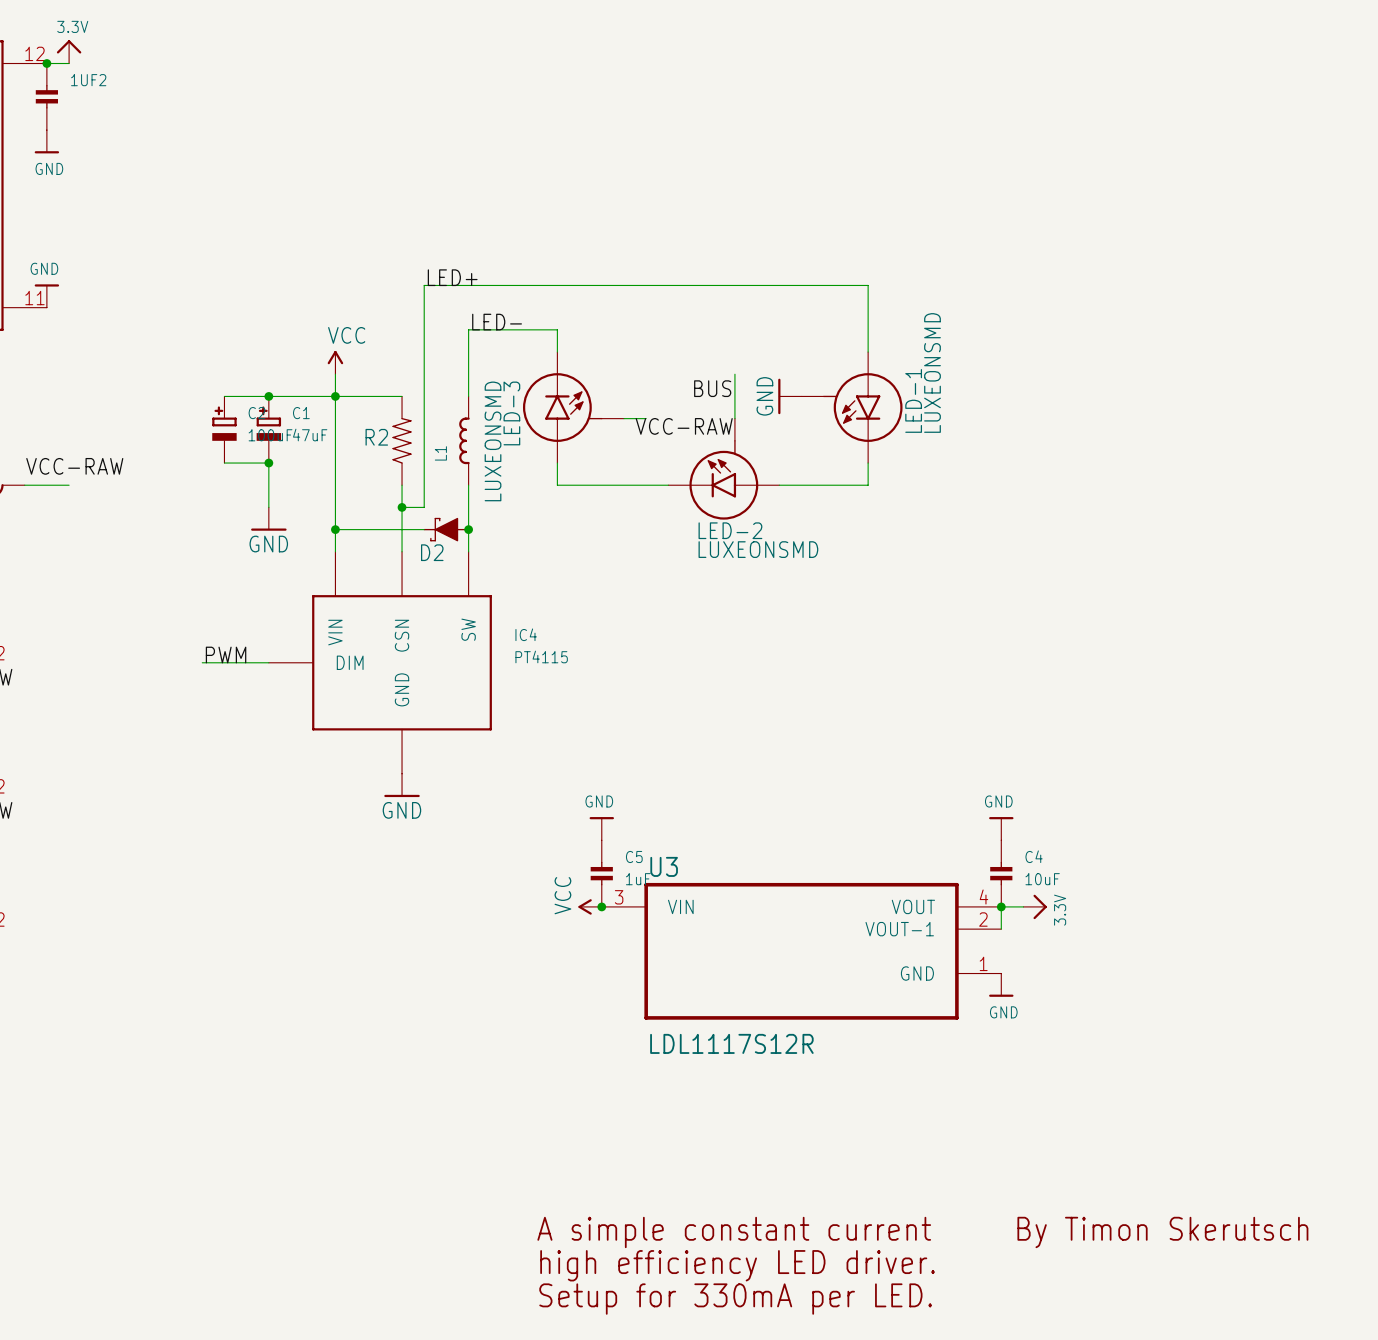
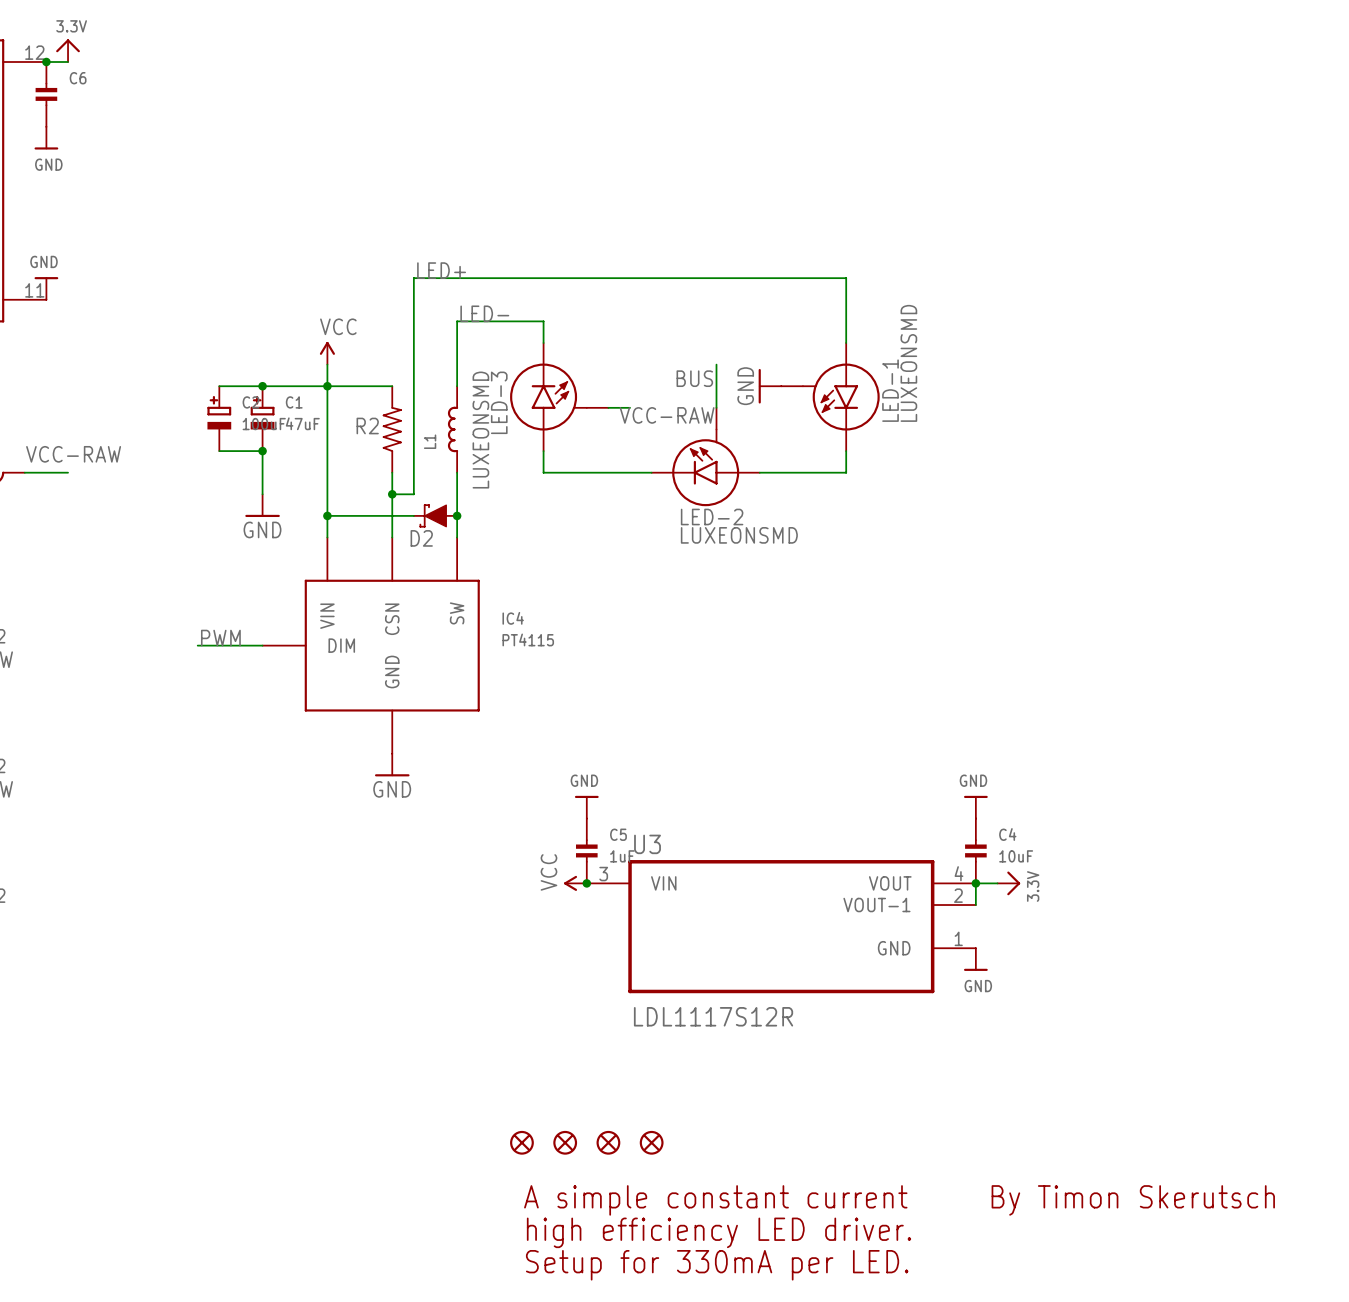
1UF2 name: 1UF2 (88, 80) -> C6 (78, 78)
part: none -> (521, 1142)
part: none -> (565, 1142)
part: none -> (608, 1142)
part: none -> (651, 1142)

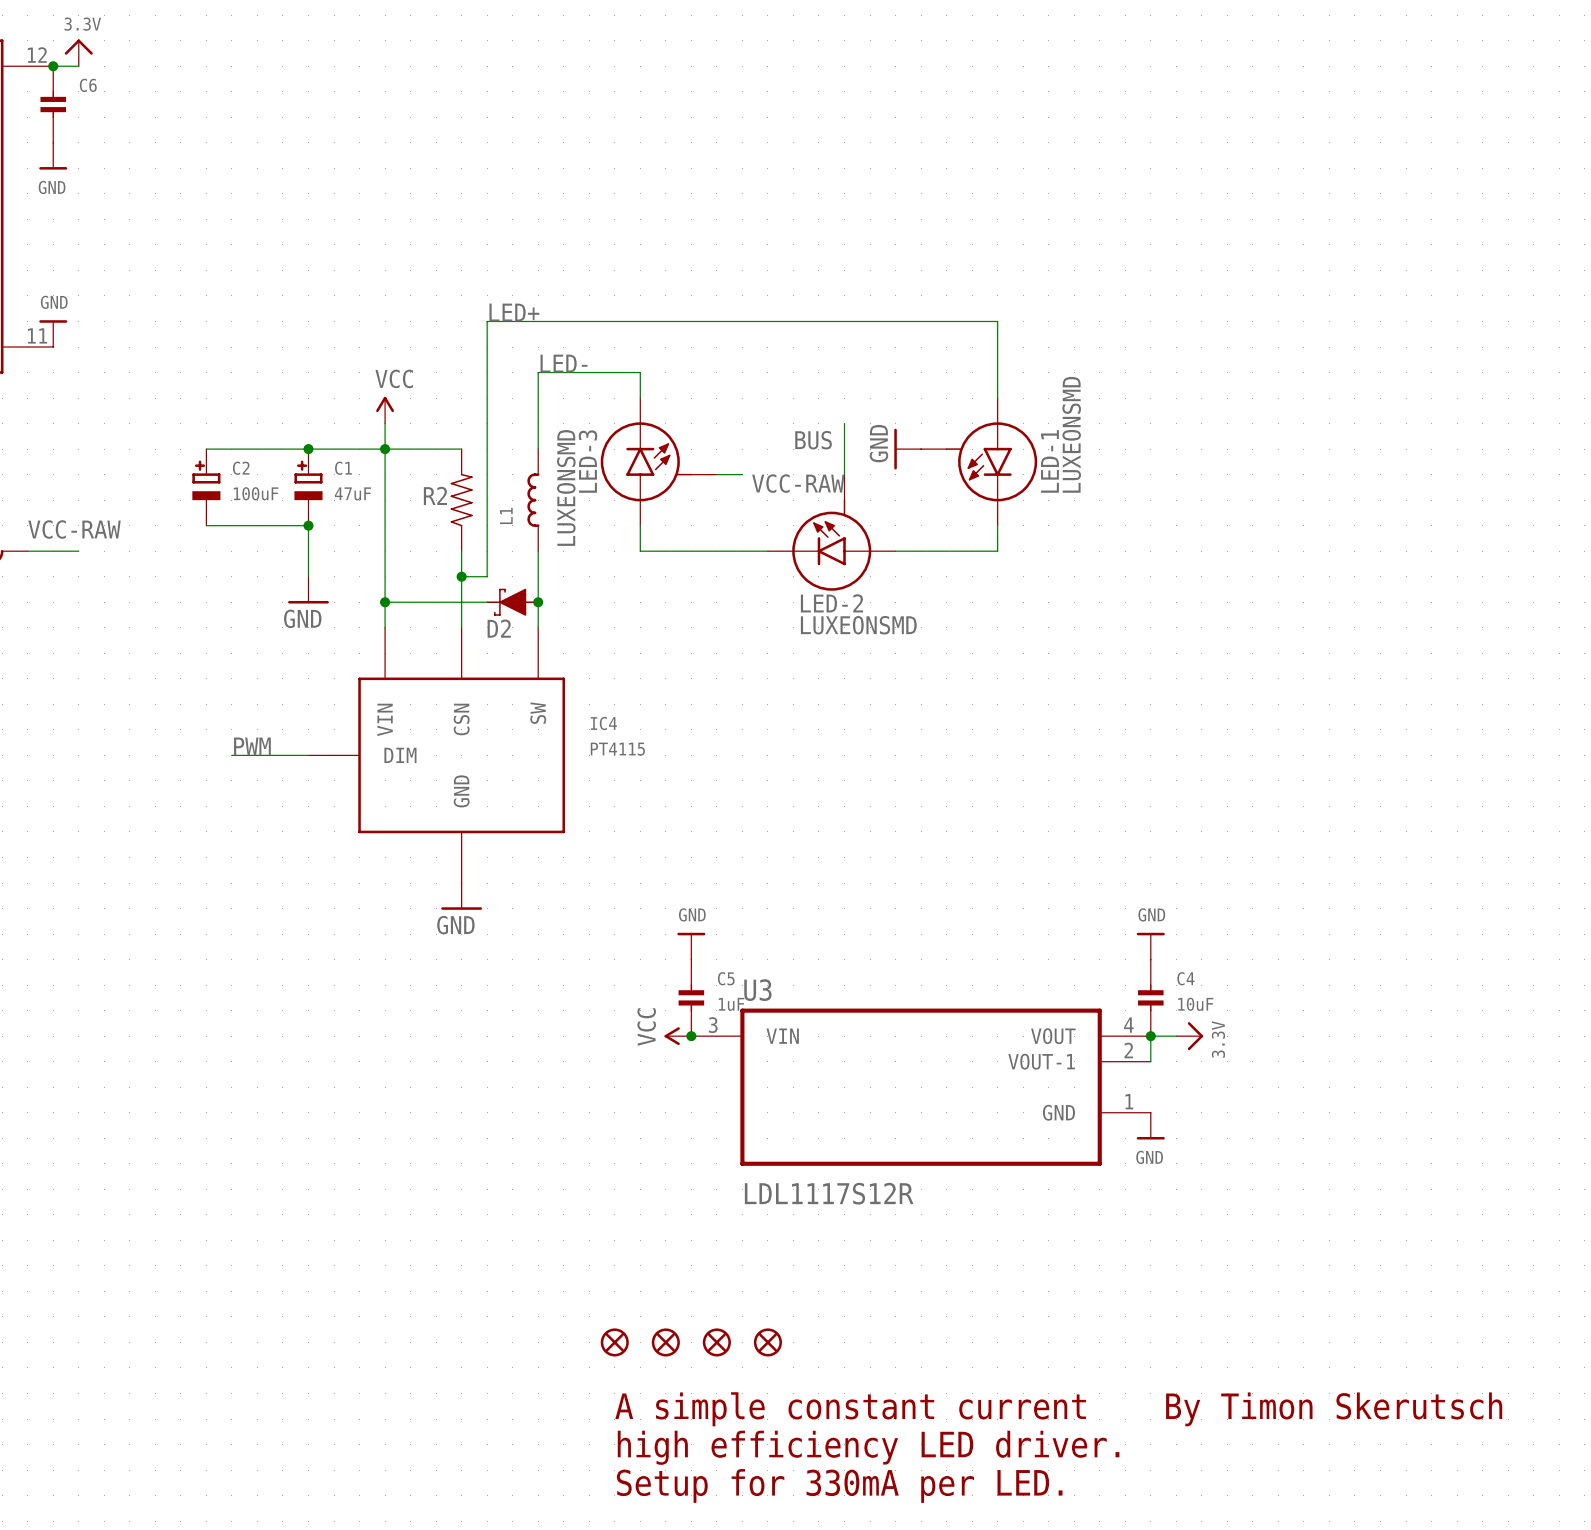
wire: none -> (206, 449) (257, 449)
C2 position: (219, 418) -> (206, 487)
wire: none -> (206, 525) (257, 525)

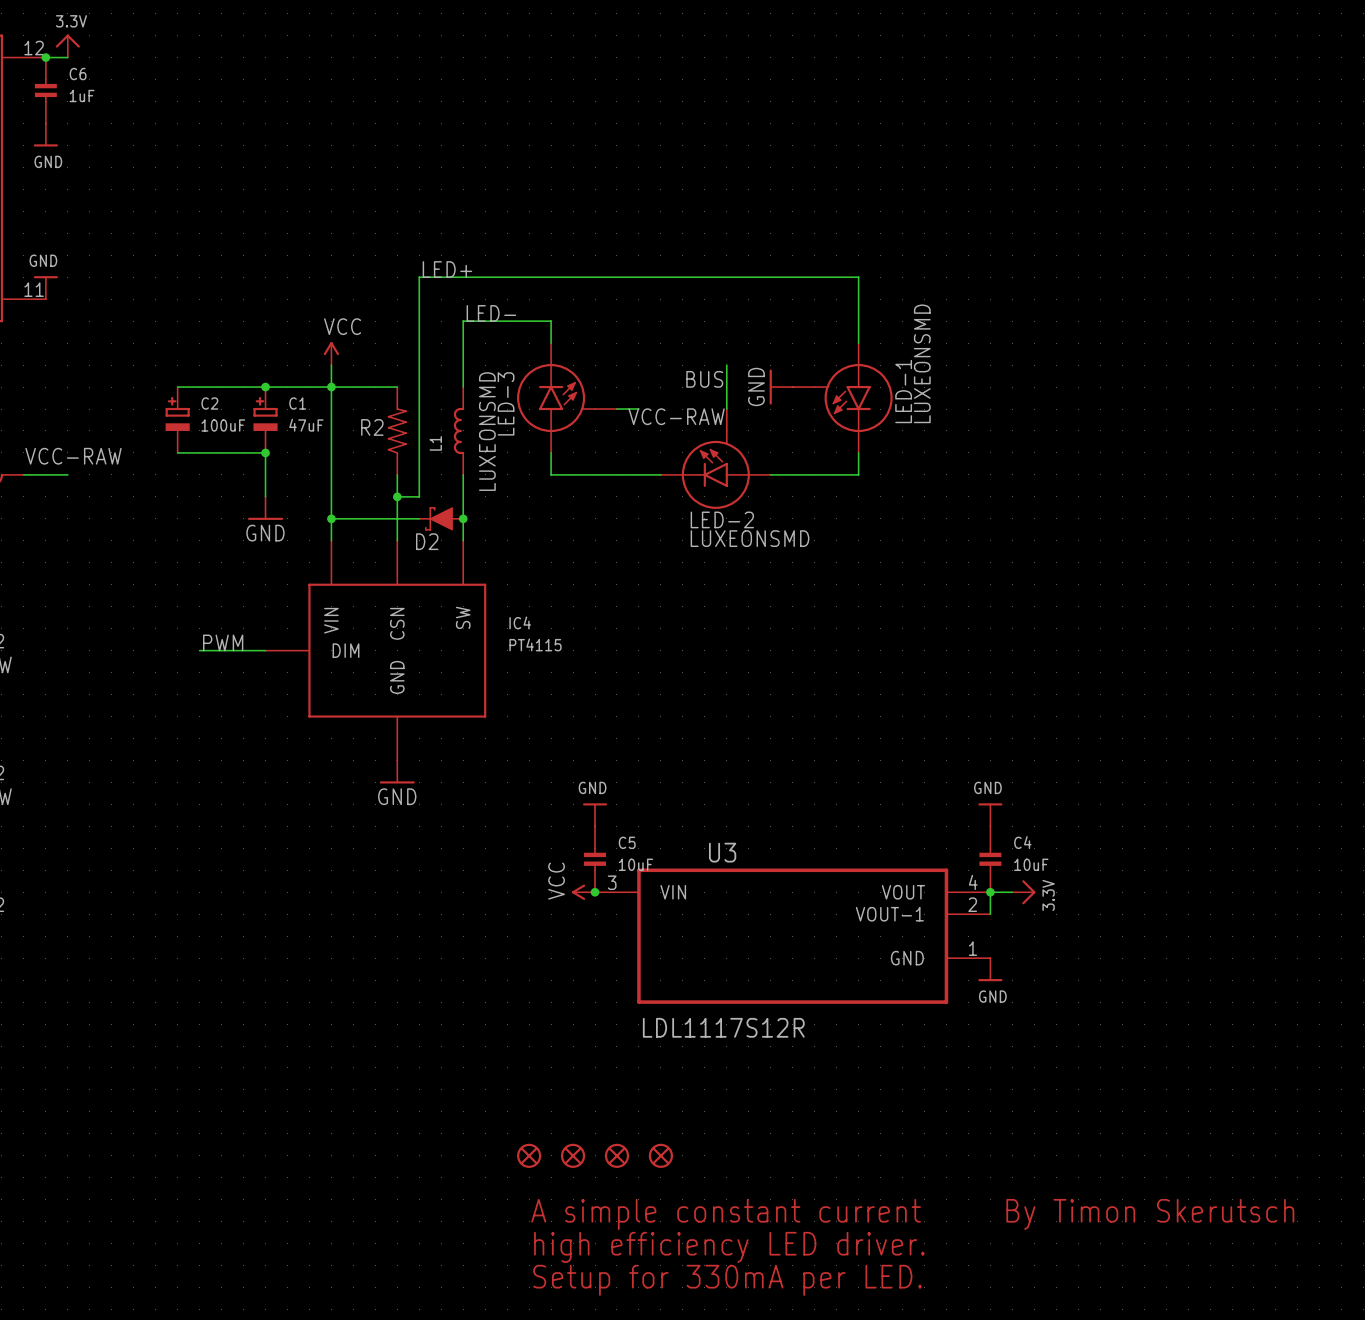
C6 value: none -> 1uF (82, 95)
U3 name position: U3 (757, 990) -> U3 (722, 852)
C5 value: 1uF (731, 1004) -> 10uF (635, 864)

